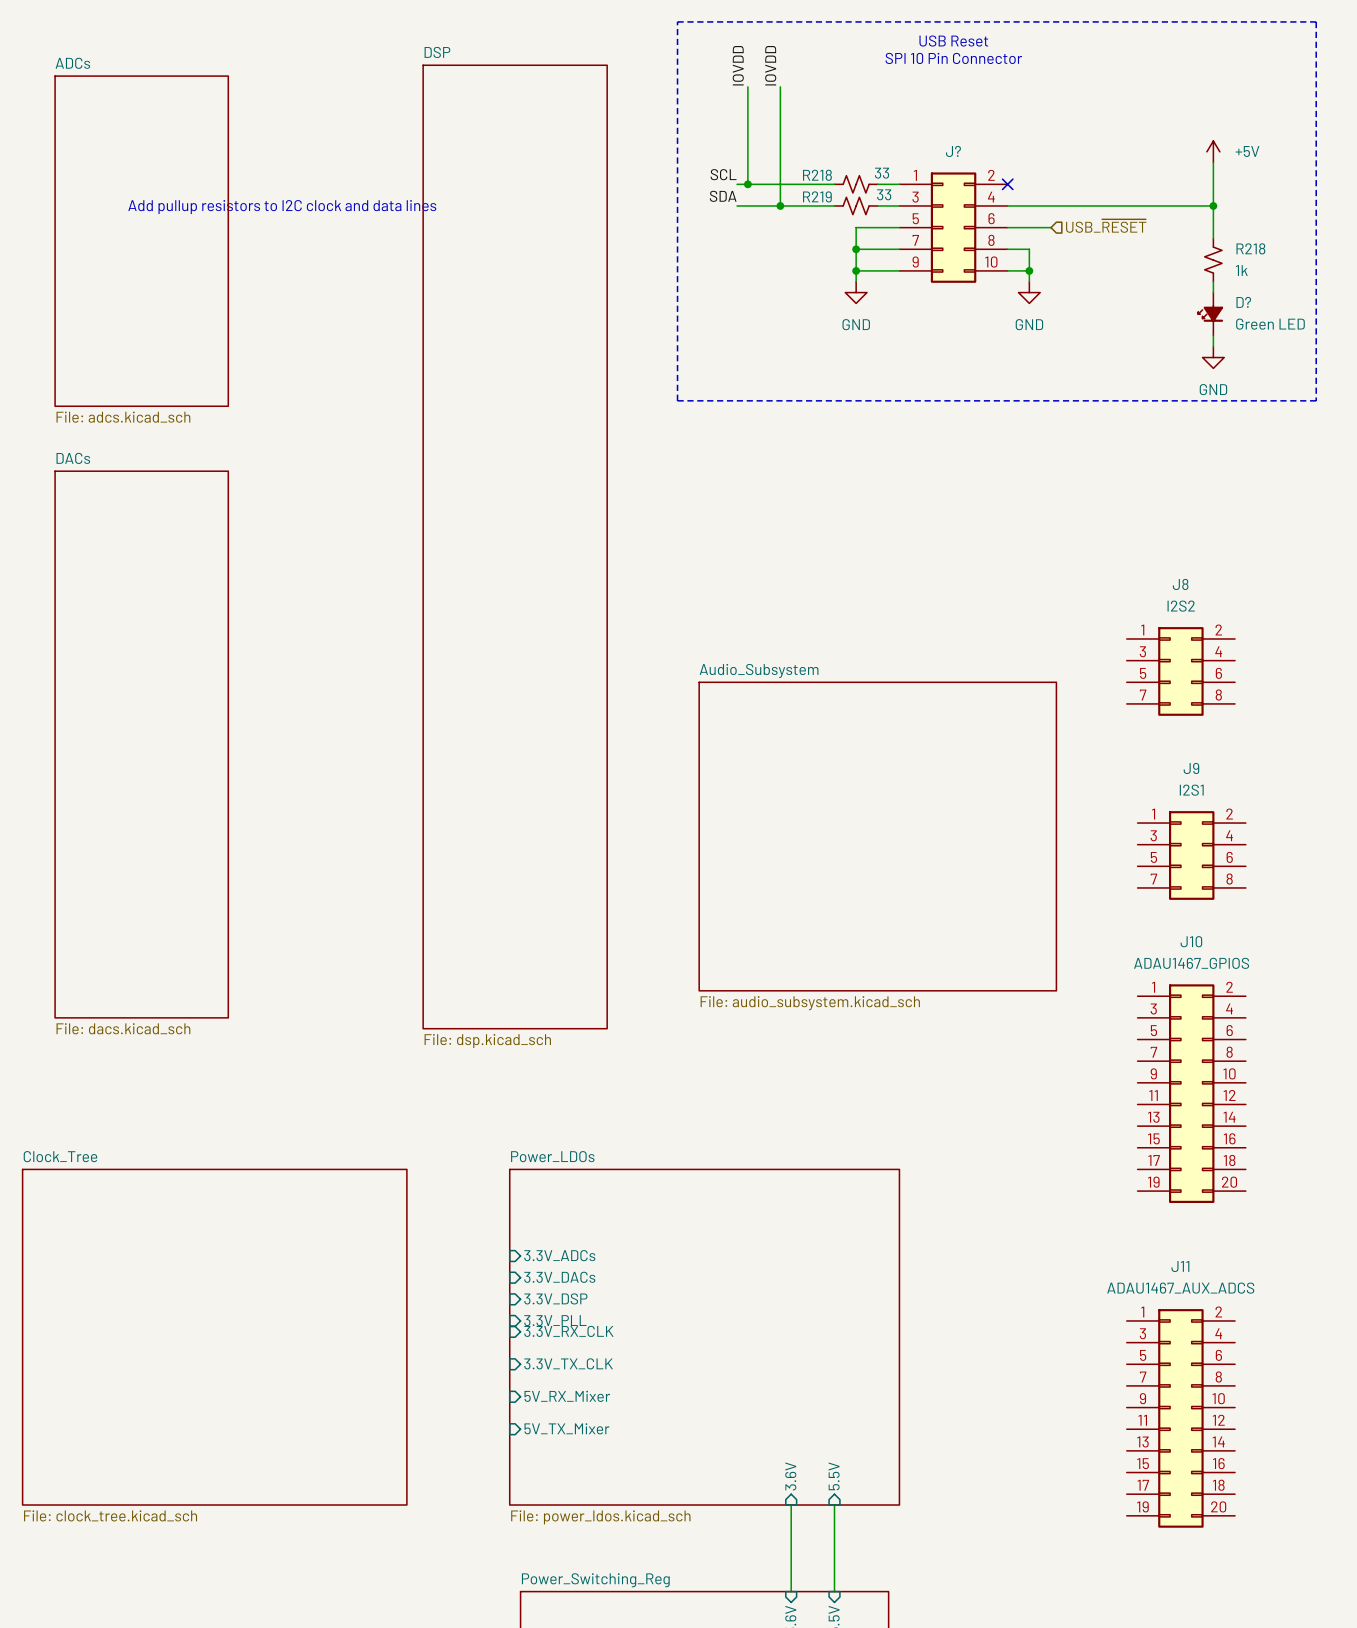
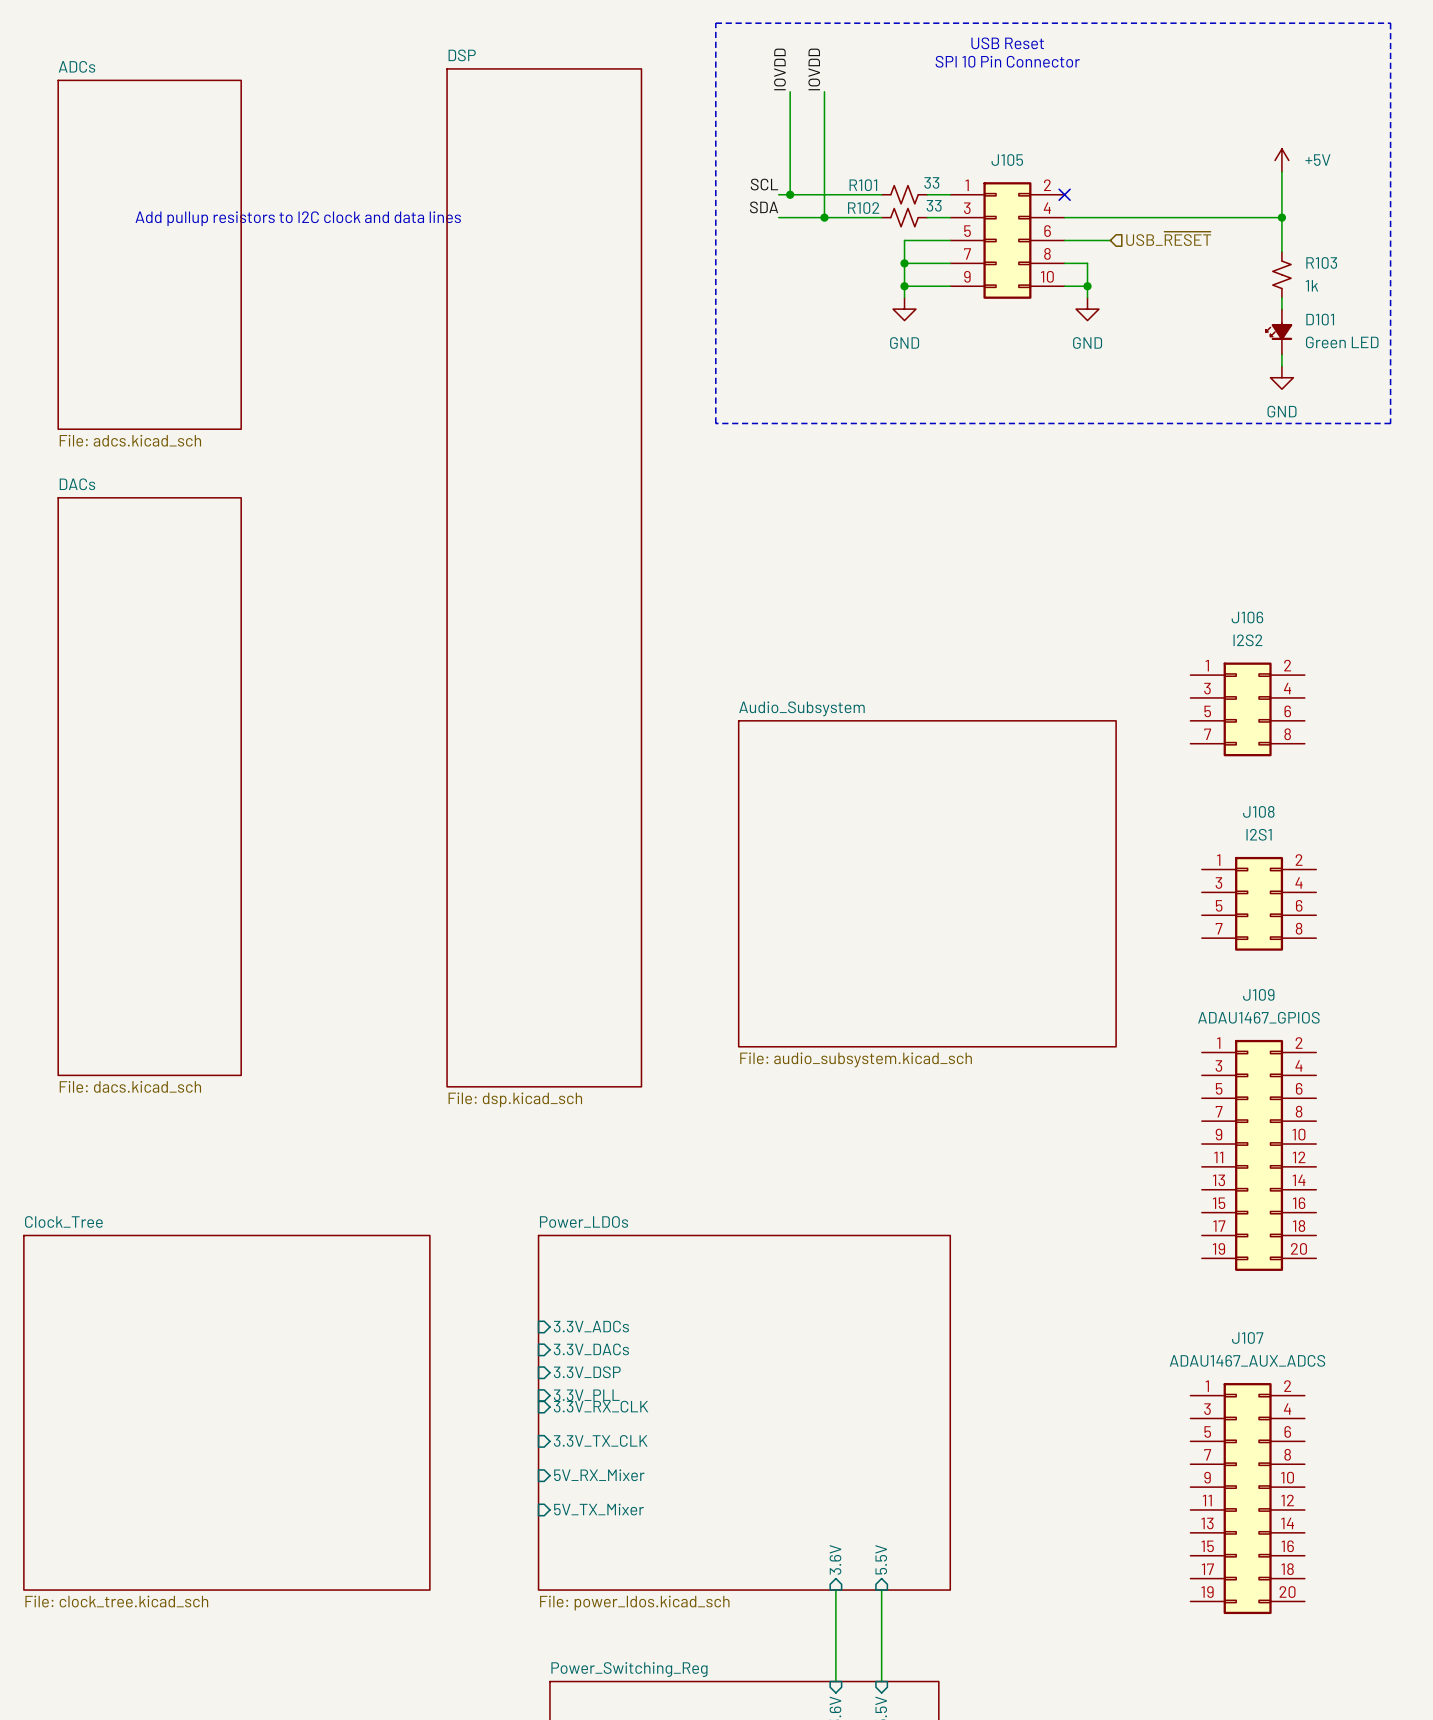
J? name: J? (953, 151) -> J105 (1007, 160)
R218 name: R218 (817, 175) -> R101 (863, 185)
R219 name: R219 (817, 196) -> R102 (863, 208)
R218 name: R218 (1250, 248) -> R103 (1321, 262)
D? name: D? (1243, 302) -> D101 (1320, 319)
J8 name: J8 (1180, 584) -> J106 (1247, 617)
J9 name: J9 (1191, 768) -> J108 (1258, 811)
J10 name: J10 (1191, 941) -> J109 (1258, 994)
J11 name: J11 (1180, 1266) -> J107 (1247, 1338)

